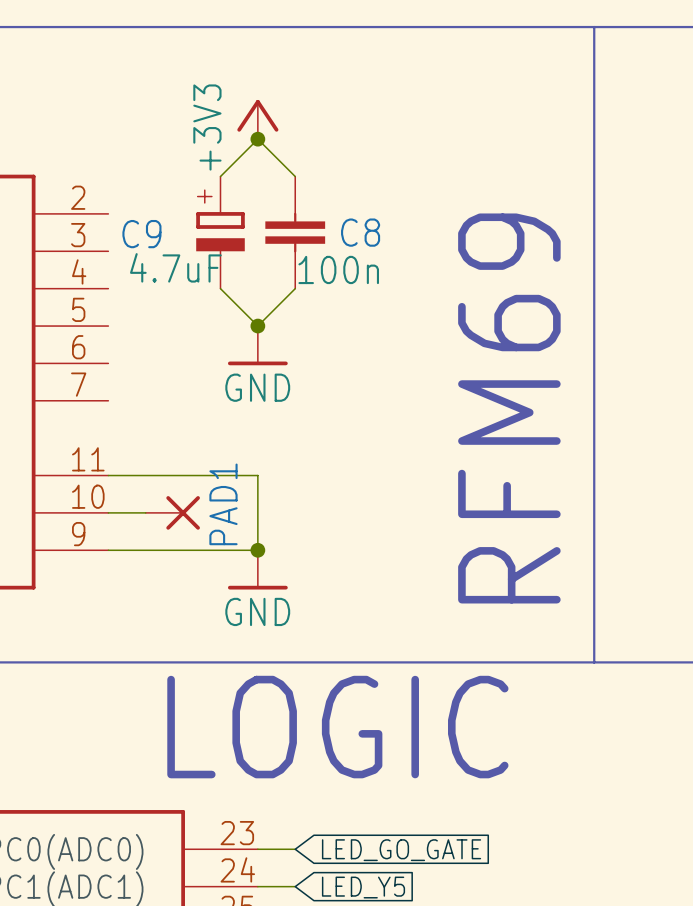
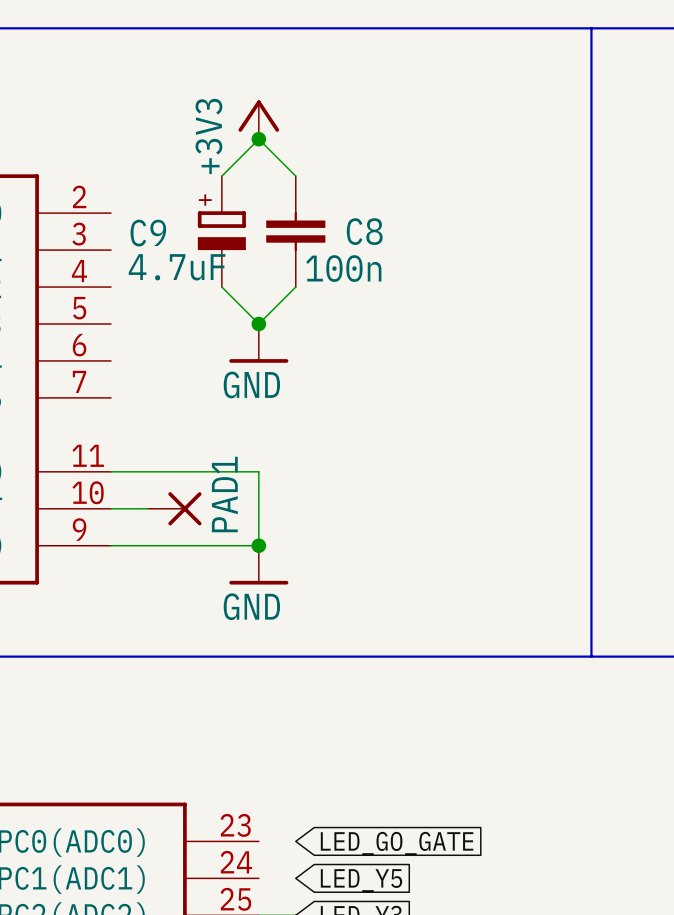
text: RFM69 (509, 408) -> none
text: LOGIC (337, 727) -> none
wire: (257, 849) (295, 849) -> none
wire: (257, 886) (295, 886) -> none

